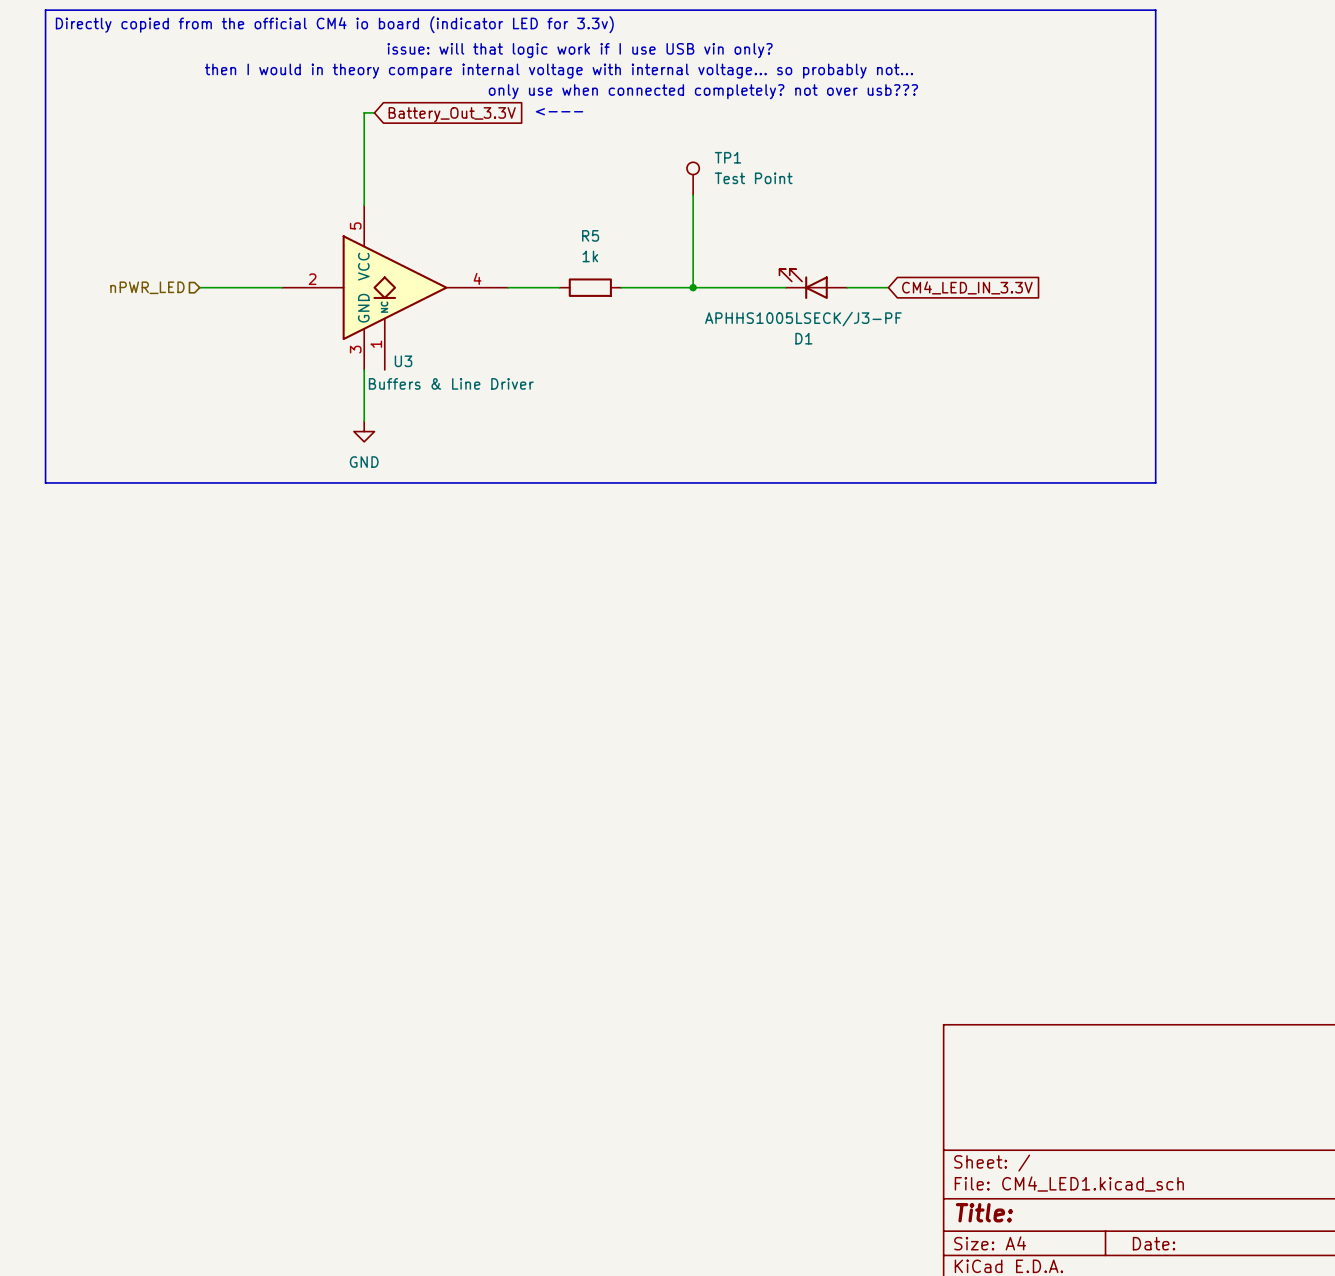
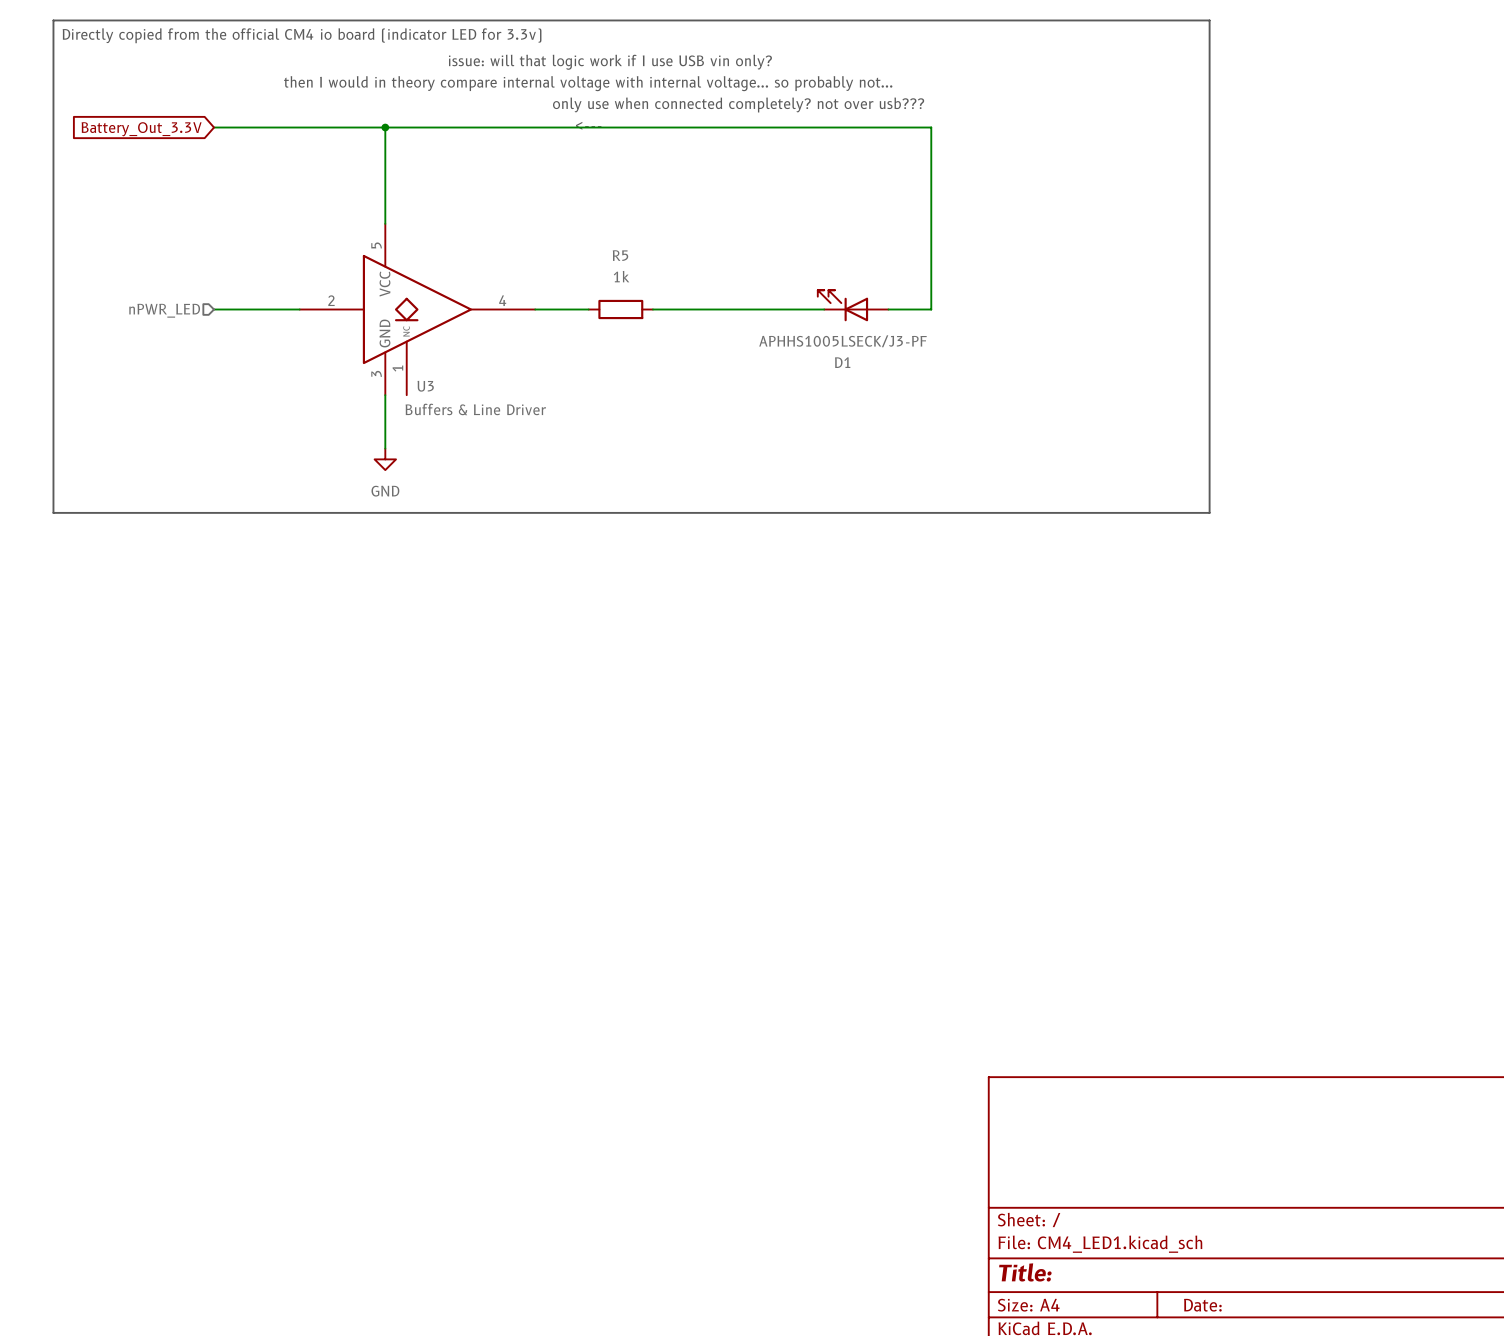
wire: none -> (214, 127) (385, 127)
junction: none -> (385, 127)
wire: none -> (396, 127) (931, 127) (931, 309)
global label rotation: 0° (452, 114) -> 180° (141, 129)
global label position: Battery_Out_3.3V (452, 114) -> Battery_Out_3.3V (141, 129)
TP1: Test Point (693, 178) -> none
wire: (693, 195) (693, 287) -> none
junction: (693, 287) -> none
global label: CM4_LED_IN_3.3V (967, 287) -> none

